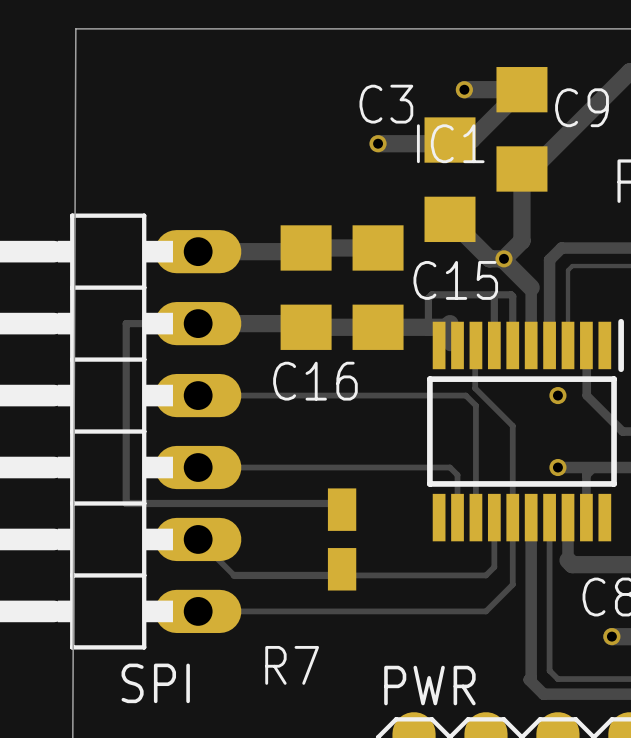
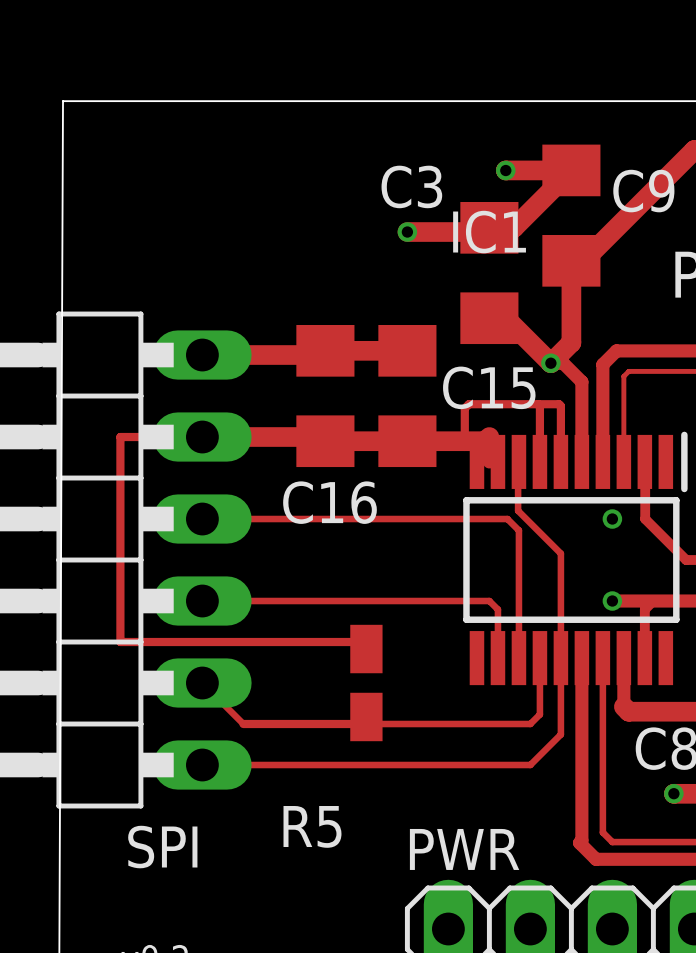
track: (450, 219) (489, 258) (503, 258) (531, 287) -> (550, 363) (563, 363) (581, 381) (581, 396)
track: none -> (505, 318) (550, 363)
R7 name: R7 (292, 665) -> R5 (312, 826)

